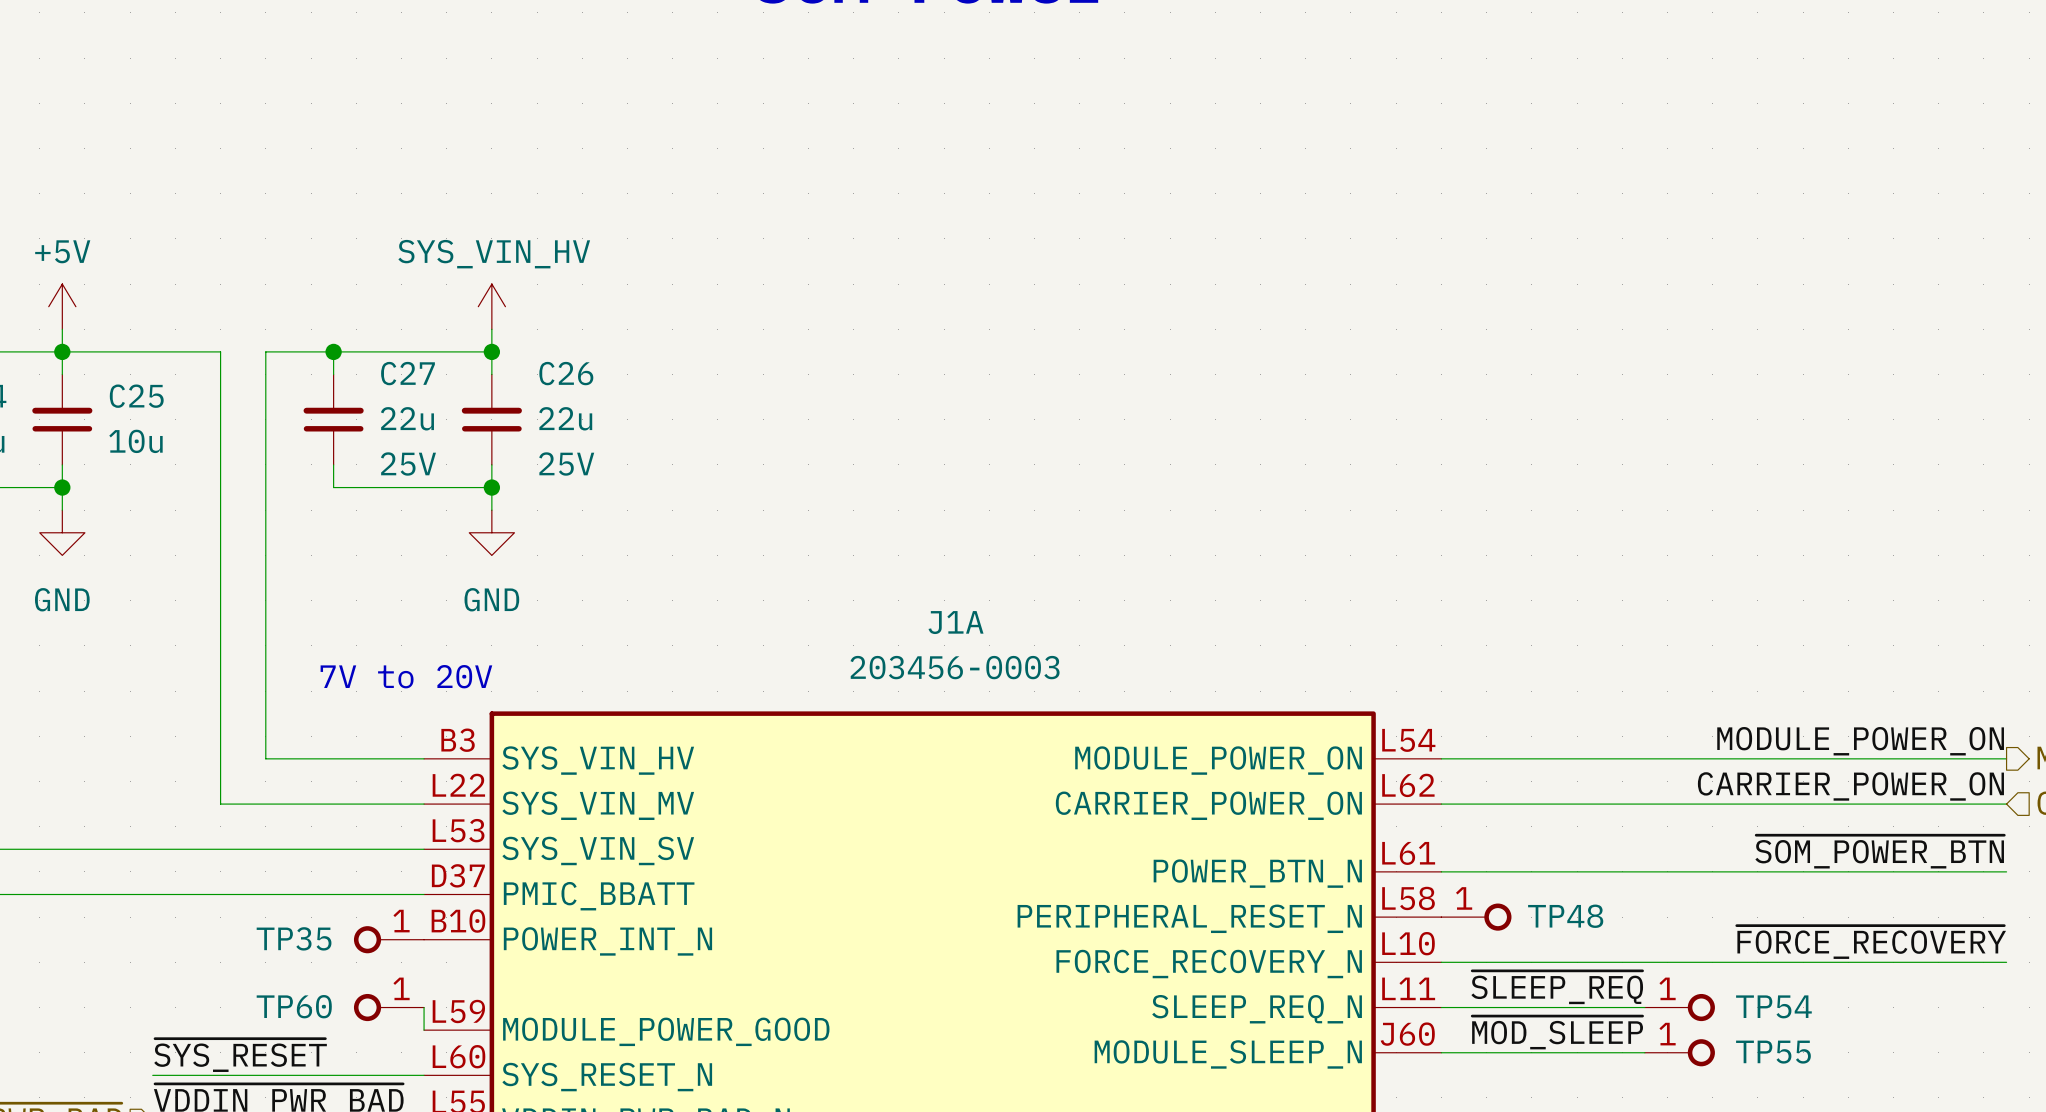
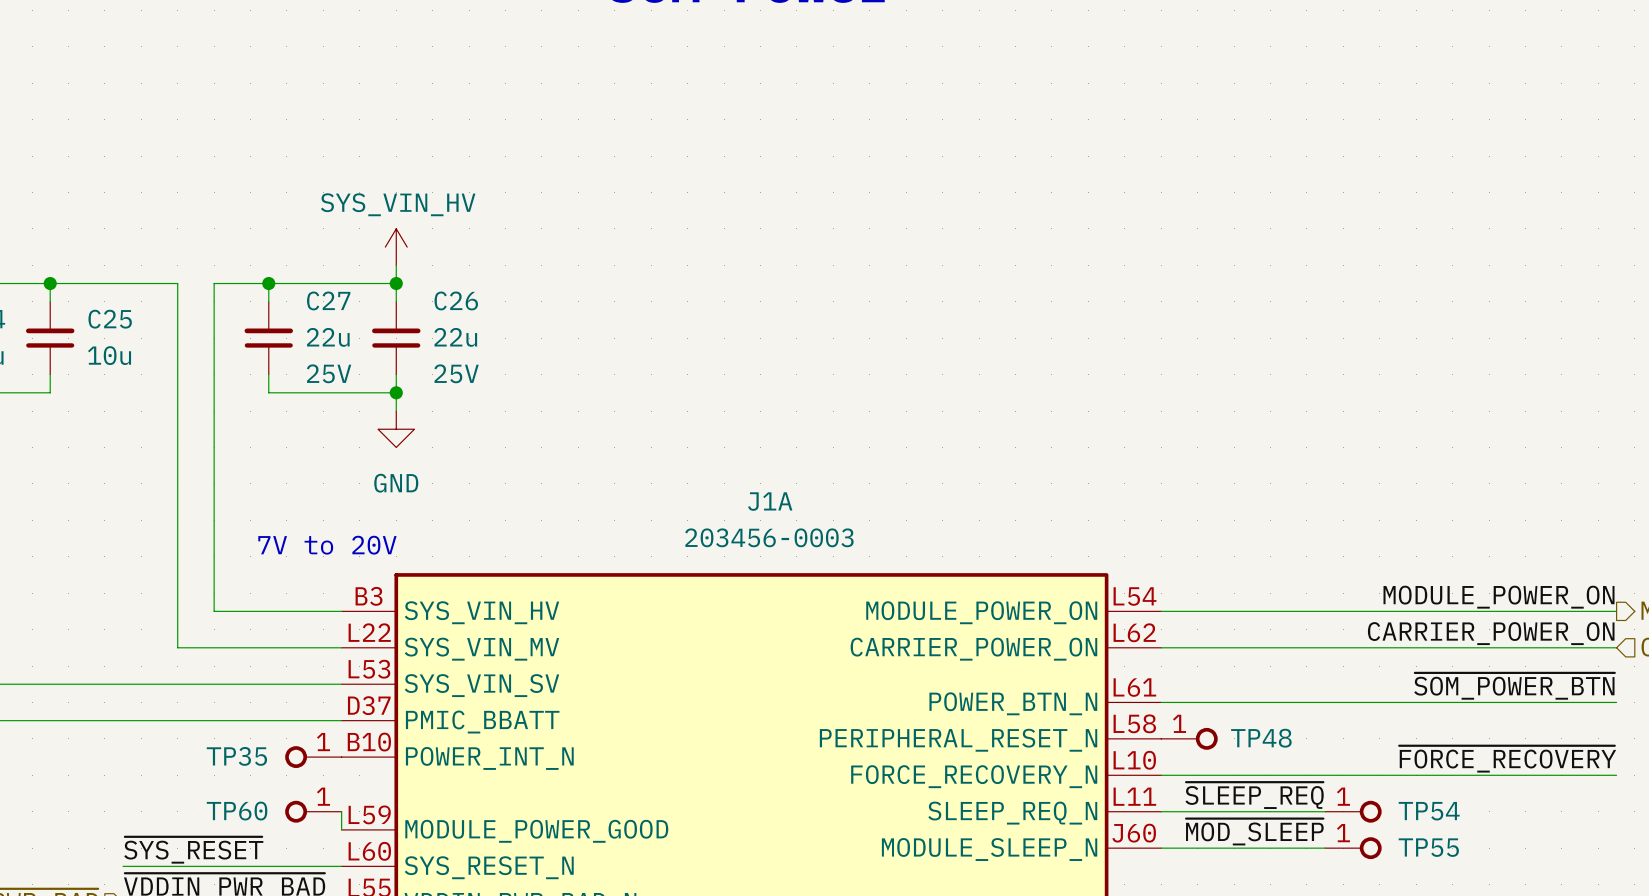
power symbol: +5V (62, 306) -> none
wire: (62, 329) (62, 351) -> none
wire: (62, 487) (62, 510) -> none
junction: (62, 487) -> none
power symbol: GND (62, 532) -> none

